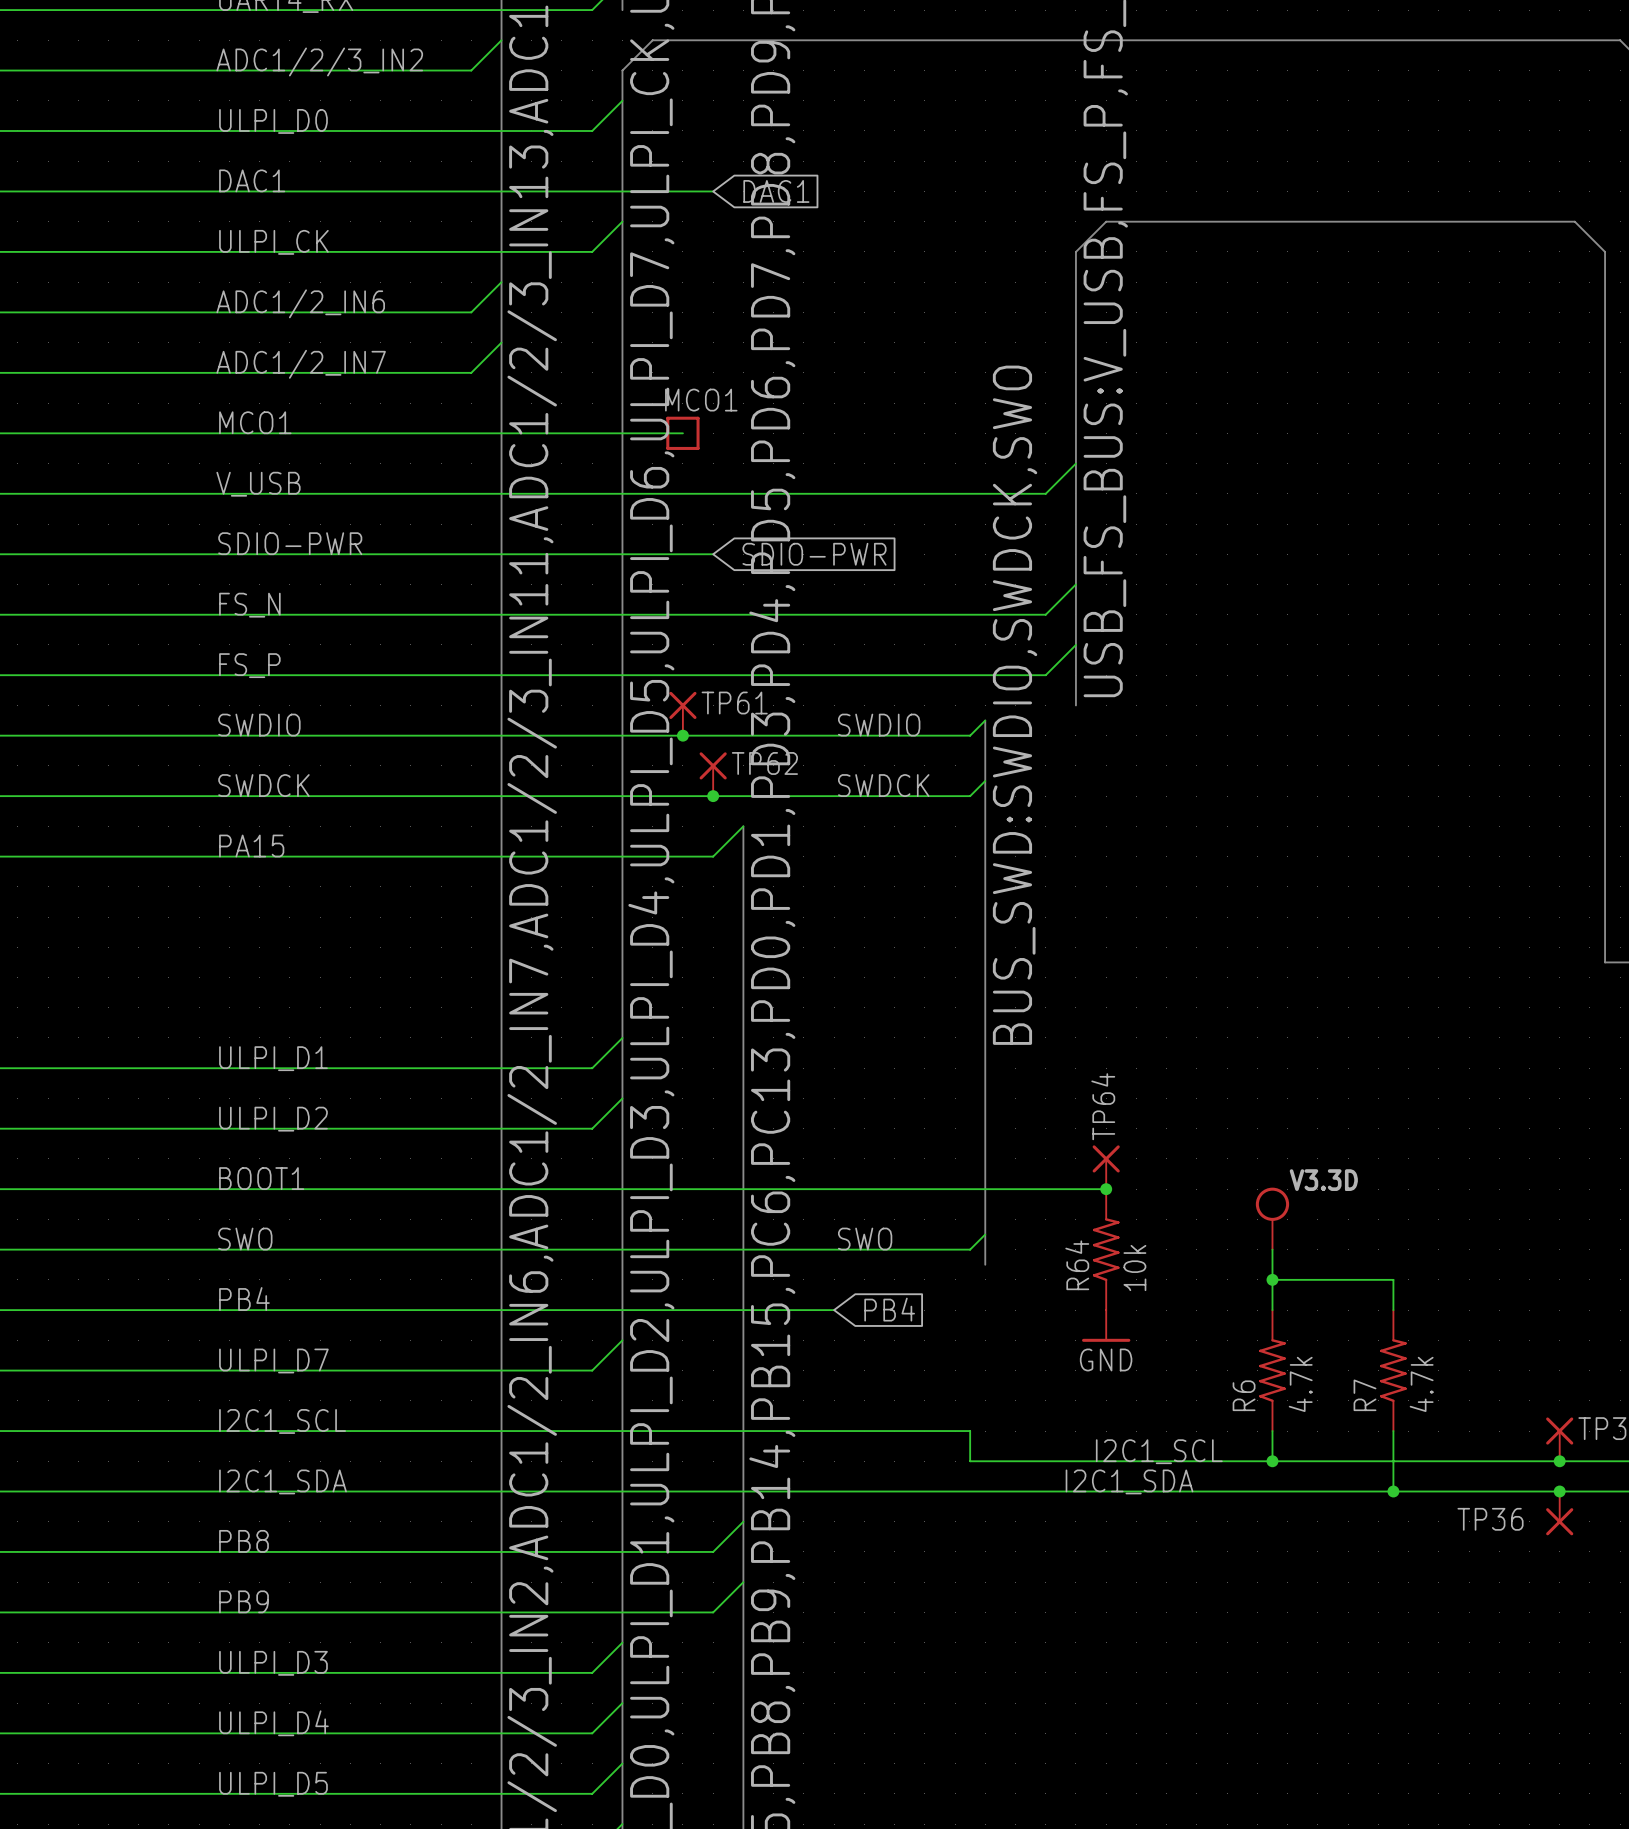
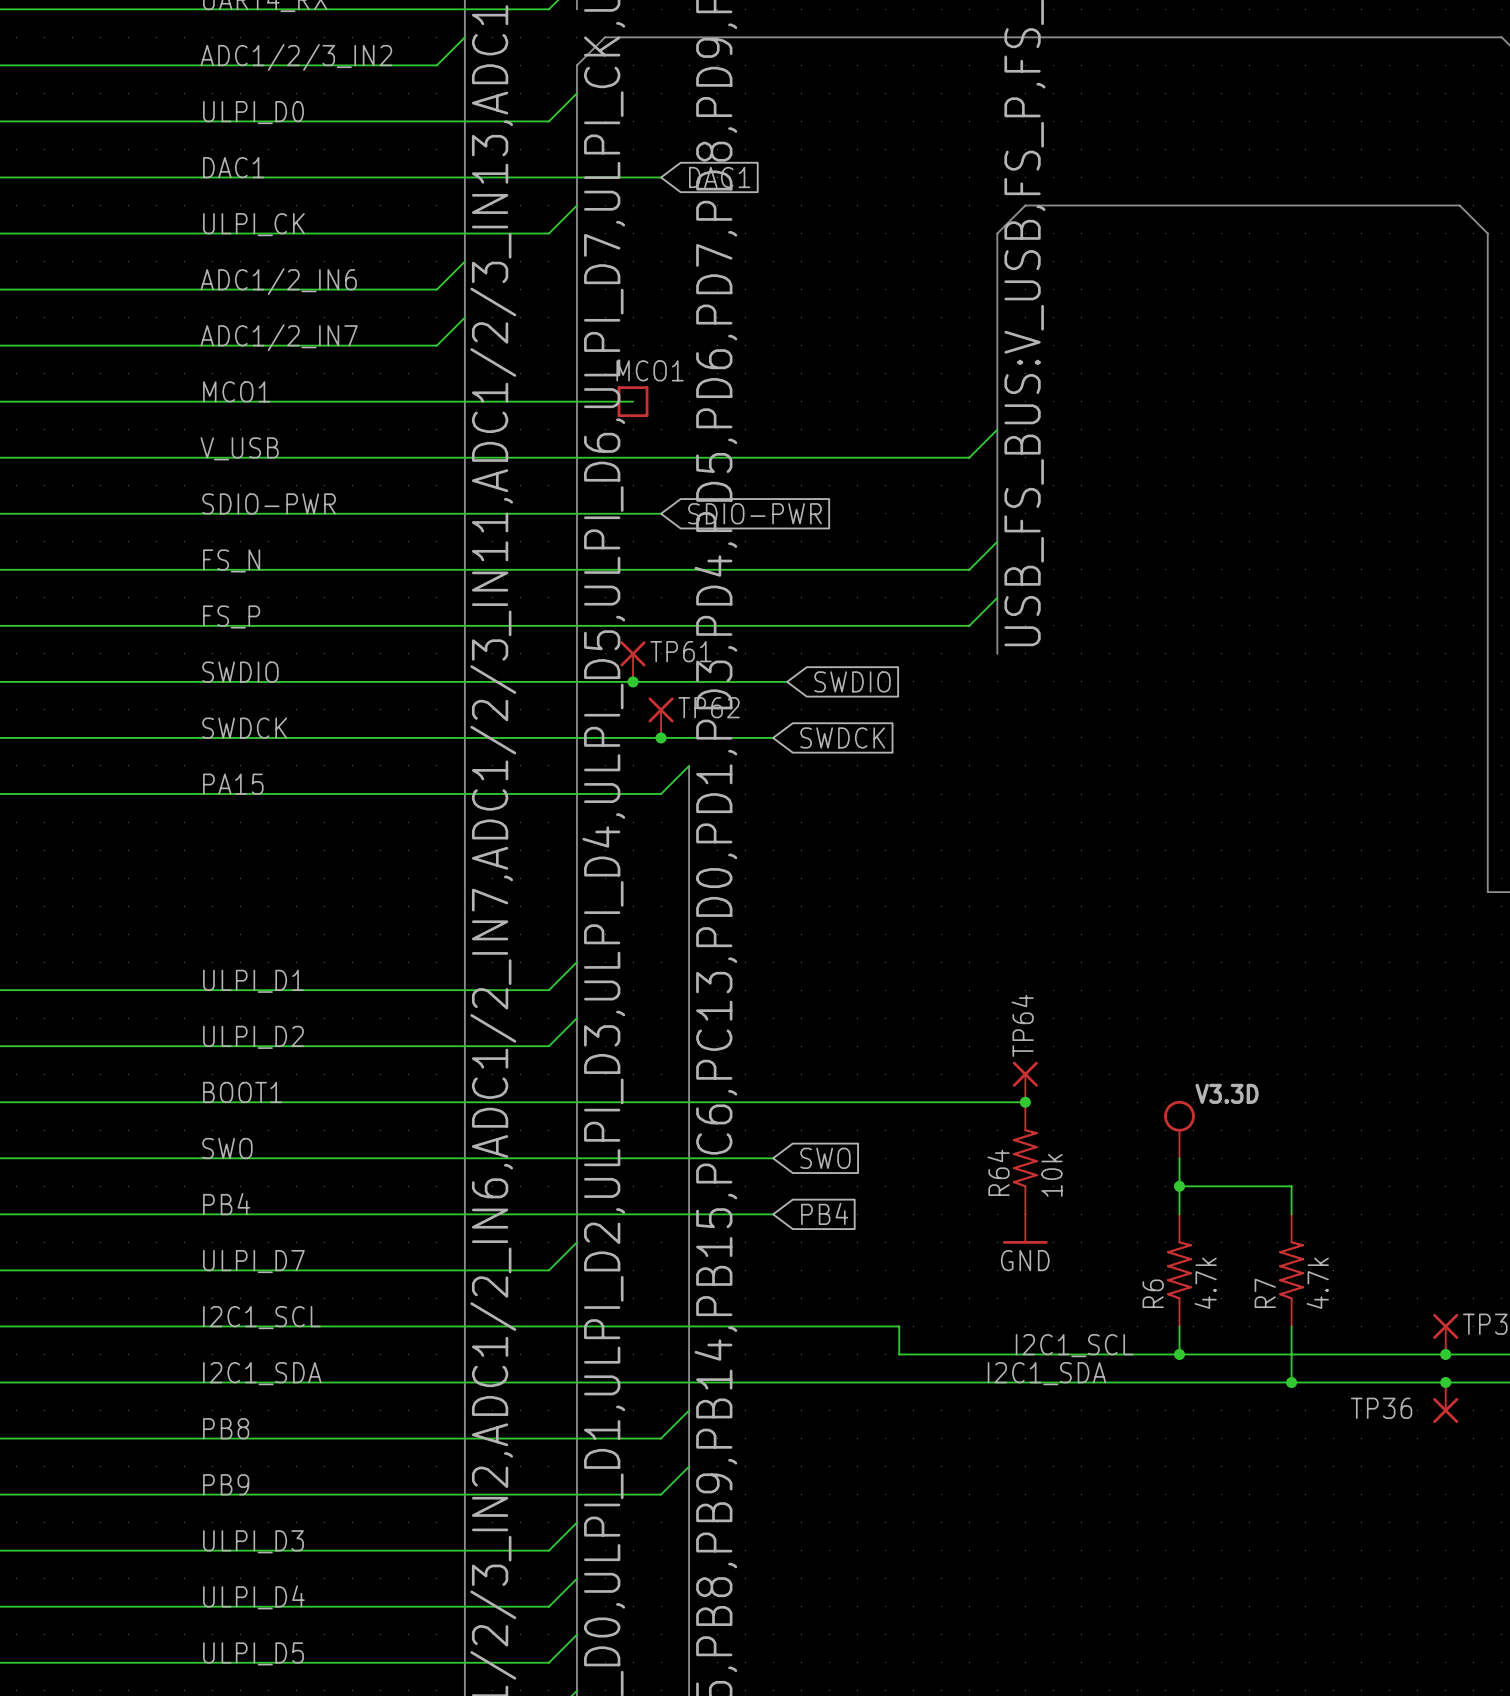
label: BUS_SWD:SWDIO,SWDCK,SWO (1015, 705) -> none
bus: (985, 720) (985, 1264) -> none
wire: (985, 720) (970, 735) (849, 735) -> none
label: SWDIO (879, 725) -> none
global label: none -> SWDIO (852, 681)
wire: (985, 781) (970, 796) (834, 796) -> none
label: SWDCK (883, 785) -> none
global label: none -> SWDCK (842, 737)
wire: (985, 1234) (970, 1249) (834, 1249) -> none
label: SWO (865, 1239) -> none
global label: none -> SWO (825, 1158)

